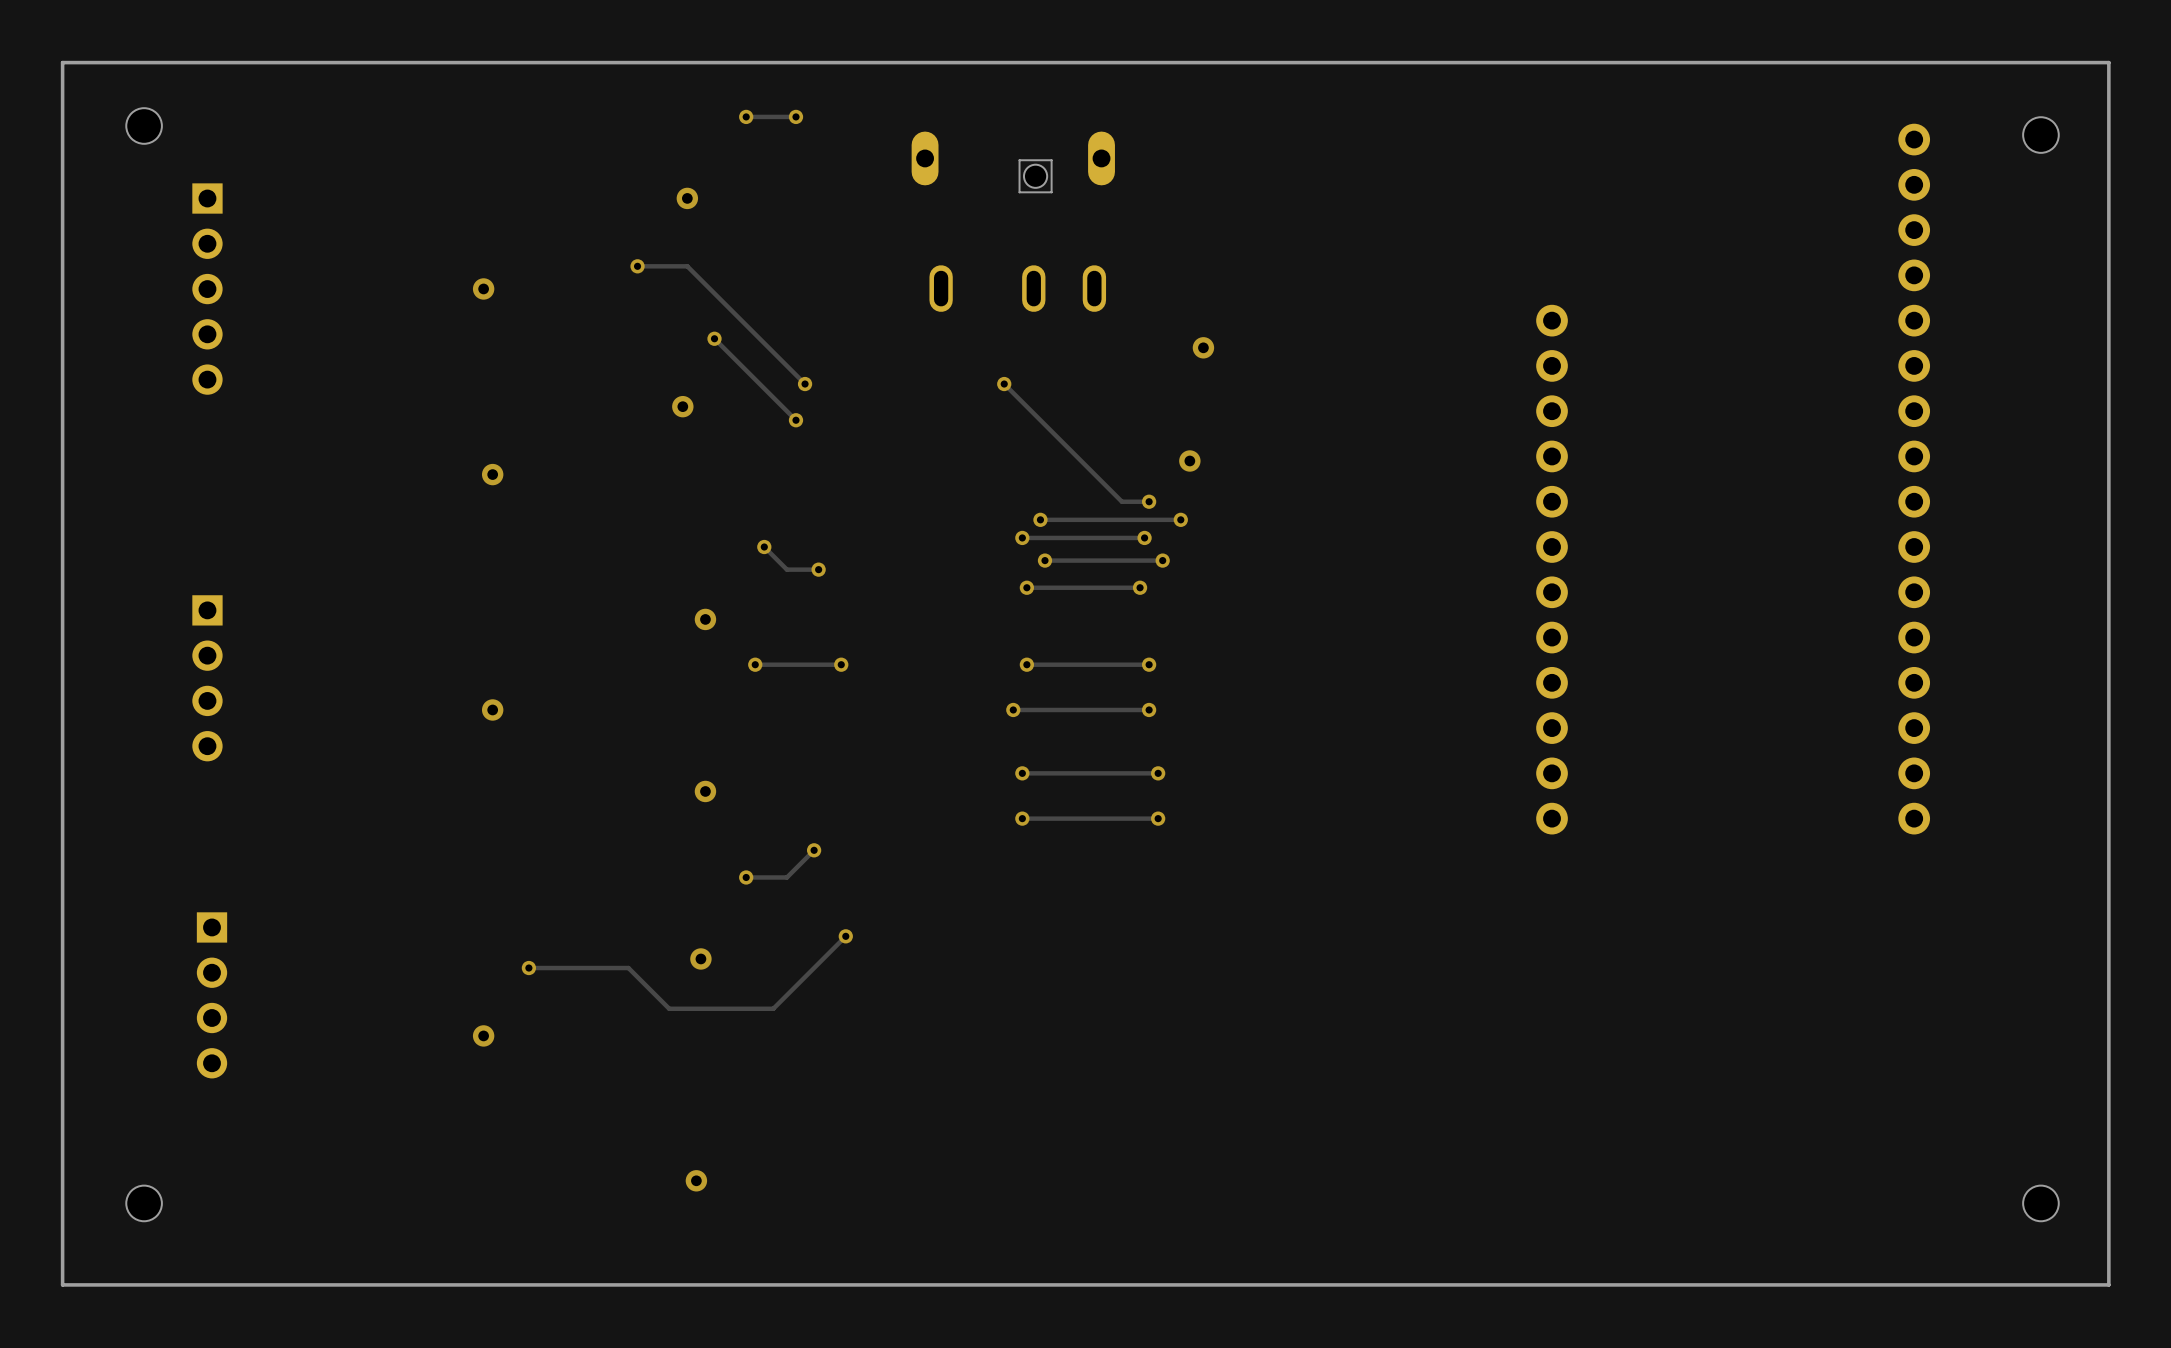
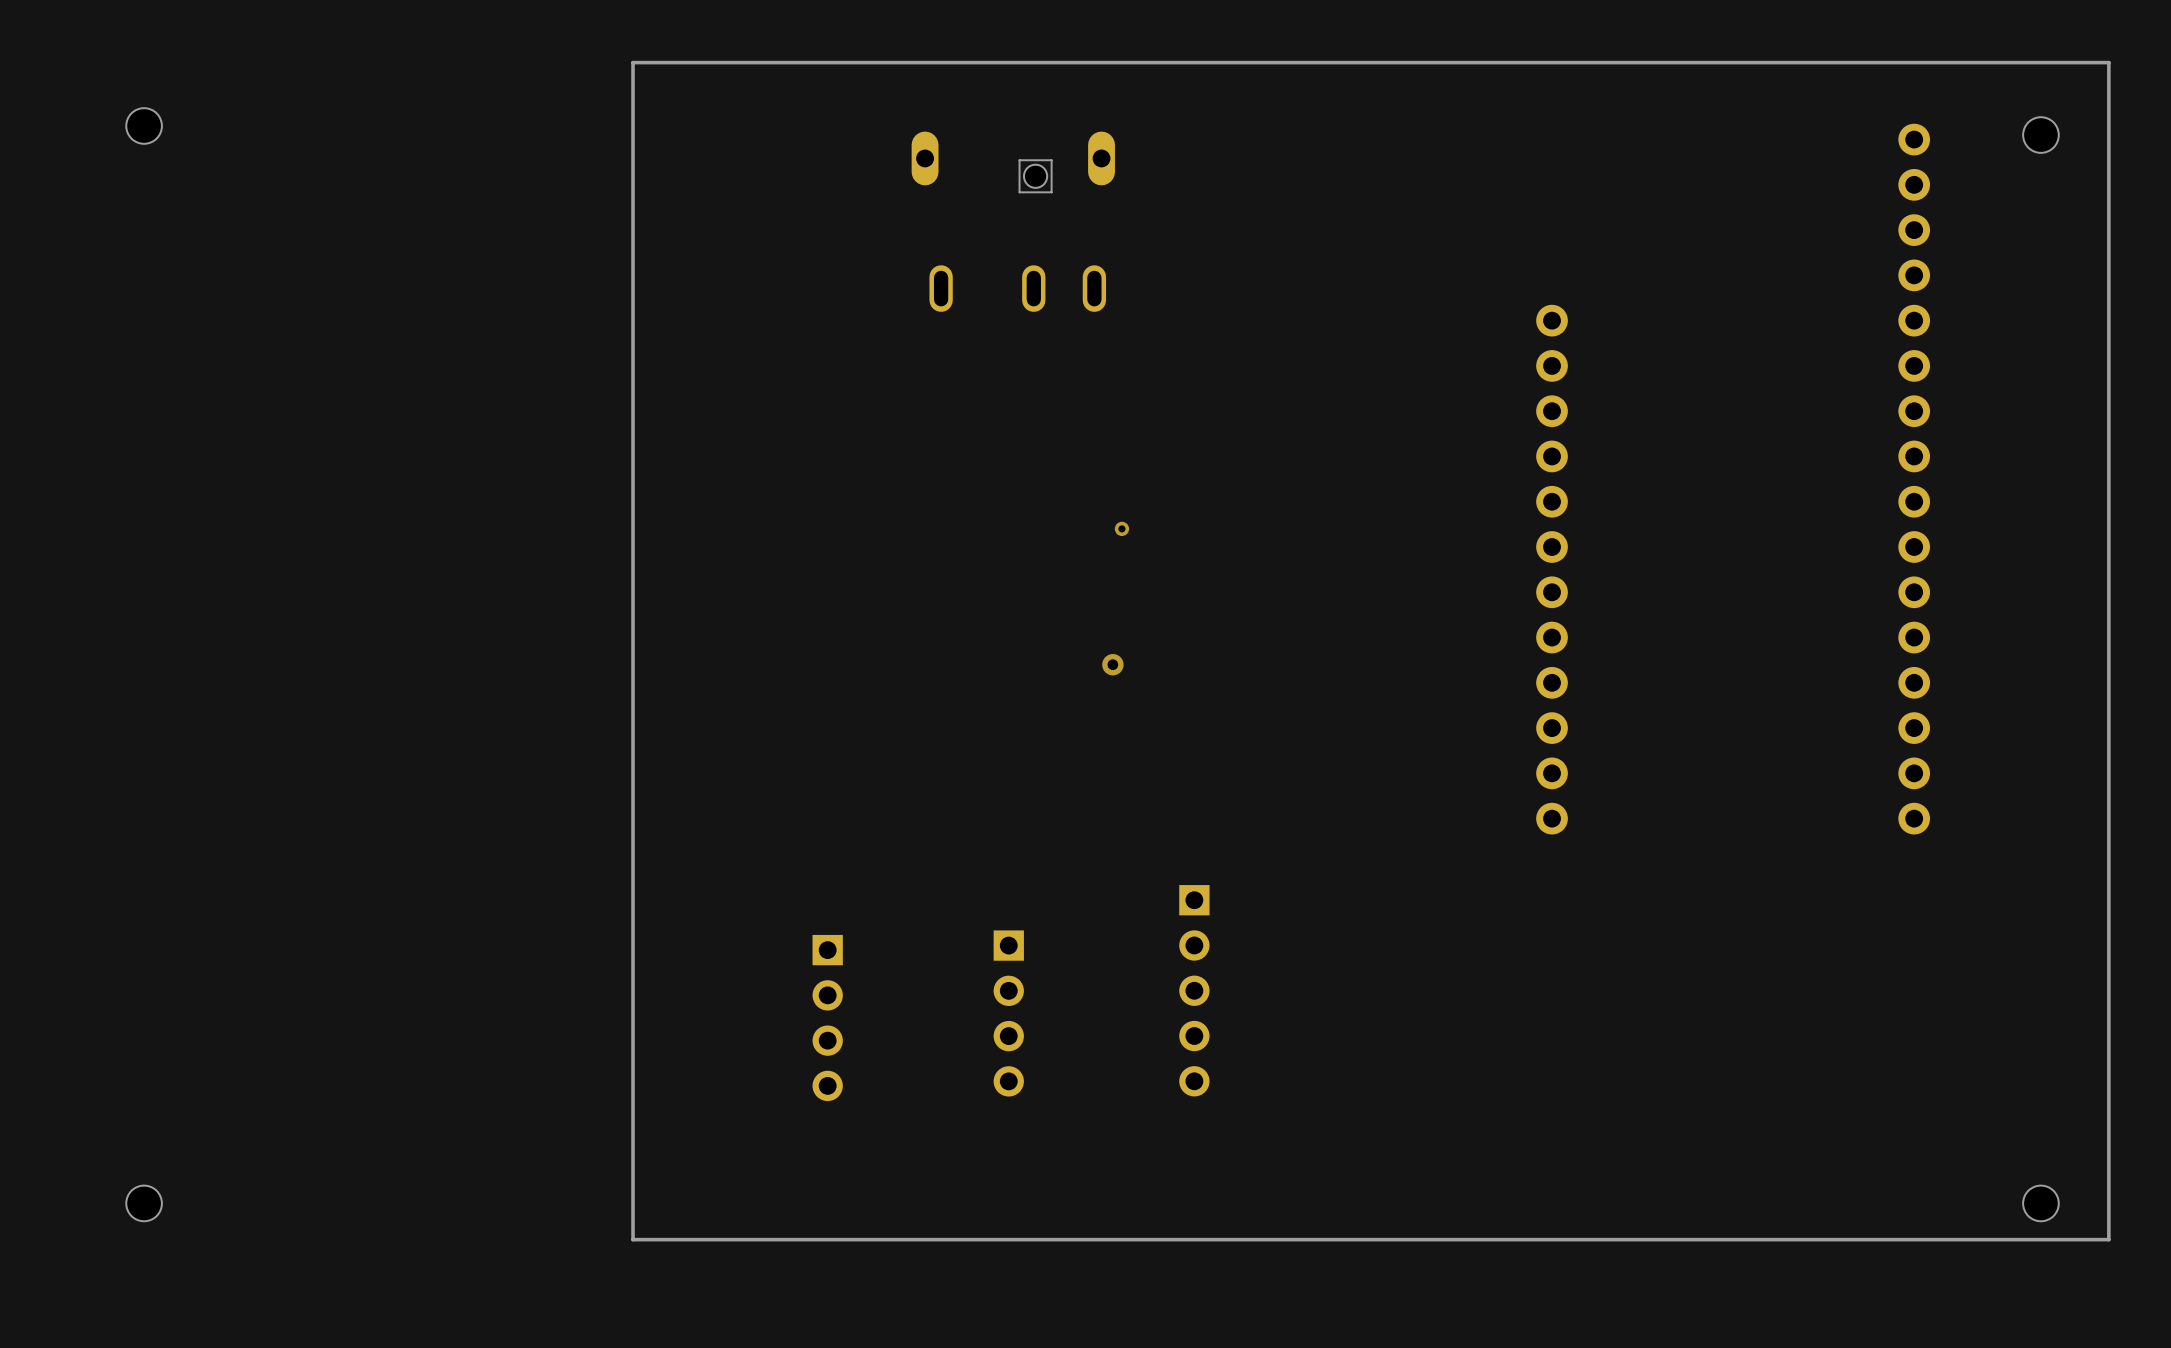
board edge: (633, 62) (62, 62) (62, 1284) (2108, 1284) (2108, 1239) -> (633, 62) (633, 1239) (2108, 1239)
via: (746, 116) -> none
track: (795, 116) (746, 116) -> none
via: (795, 116) -> none
via: (687, 198) -> none
track: (637, 266) (687, 266) (805, 384) -> none
via: (637, 266) -> none
via: (483, 288) -> none
part: (207, 289) -> none
track: (714, 338) (795, 420) -> none
via: (714, 338) -> none
via: (1203, 347) -> none
via: (805, 384) -> none
track: (1004, 384) (1121, 501) (1149, 501) -> none
via: (1004, 384) -> none
via: (682, 406) -> none
via: (795, 420) -> none
via: (1189, 460) -> none
via: (492, 474) -> none
via: (1149, 501) -> none
via: (1040, 519) -> none
track: (1180, 519) (1040, 519) -> none
via: (1180, 519) -> none
via: none -> (1121, 528)
via: (1022, 537) -> none
track: (1144, 537) (1022, 537) -> none
via: (1144, 537) -> none
track: (764, 547) (786, 569) (818, 569) -> none
via: (764, 547) -> none
via: (1044, 560) -> none
track: (1162, 560) (1044, 560) -> none
via: (1162, 560) -> none
via: (818, 569) -> none
via: (1026, 587) -> none
track: (1140, 587) (1026, 587) -> none
via: (1140, 587) -> none
via: (705, 619) -> none
via: (755, 664) -> none
track: (841, 664) (755, 664) -> none
via: (841, 664) -> none
via: (1026, 664) -> none
via: none -> (1112, 664)
track: (1149, 664) (1026, 664) -> none
via: (1149, 664) -> none
part: (207, 678) -> none
via: (492, 709) -> none
via: (1013, 709) -> none
track: (1149, 709) (1013, 709) -> none
via: (1149, 709) -> none
via: (1022, 773) -> none
track: (1158, 773) (1022, 773) -> none
via: (1158, 773) -> none
via: (705, 791) -> none
via: (1022, 818) -> none
track: (1158, 818) (1022, 818) -> none
via: (1158, 818) -> none
track: (814, 850) (786, 877) (746, 877) -> none
via: (814, 850) -> none
via: (746, 877) -> none
track: (845, 936) (773, 1008) (669, 1008) (628, 968) (528, 968) -> none
via: (845, 936) -> none
via: (700, 958) -> none
via: (528, 968) -> none
part: none -> (1194, 990)
part: (212, 995) -> none
part: none -> (1008, 1013)
part: none -> (827, 1018)
via: (483, 1035) -> none
via: (696, 1180) -> none

